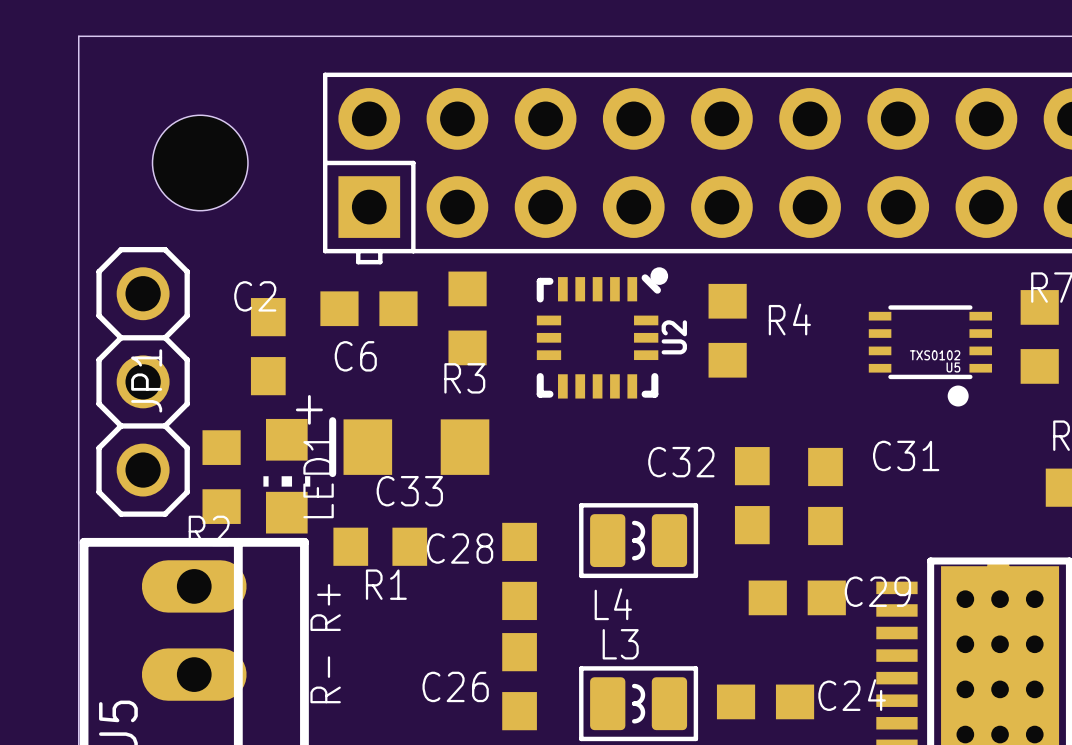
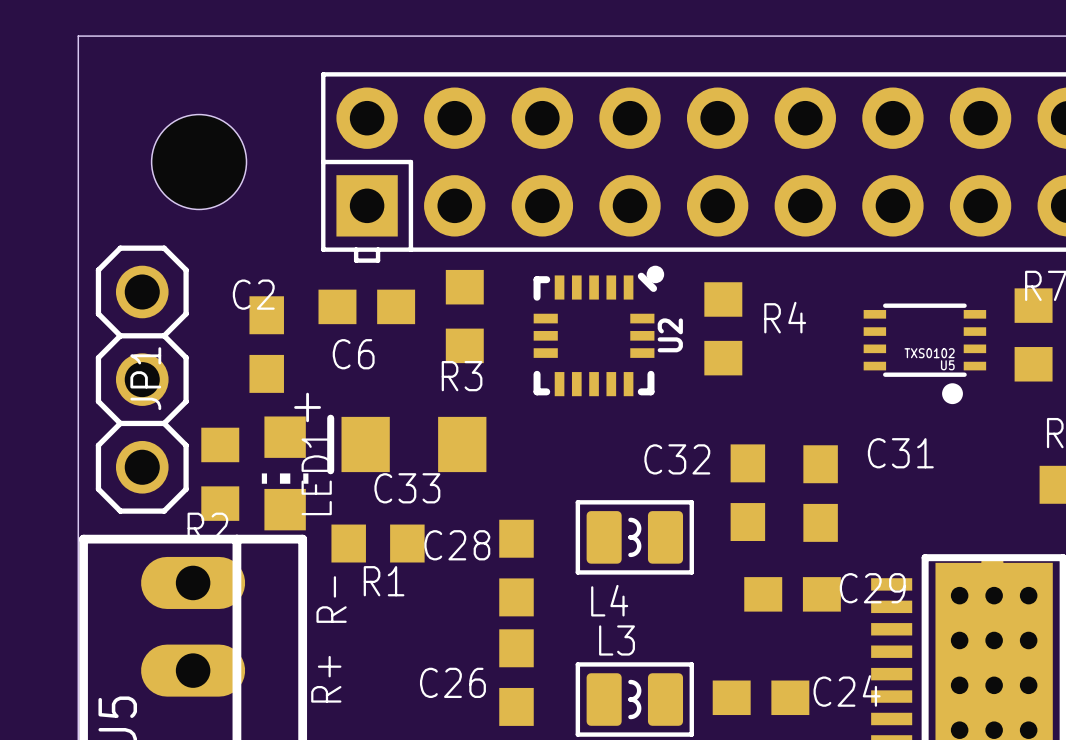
text position: R+ (325, 607) -> R+ (326, 679)
text position: R- (325, 679) -> R- (331, 599)

